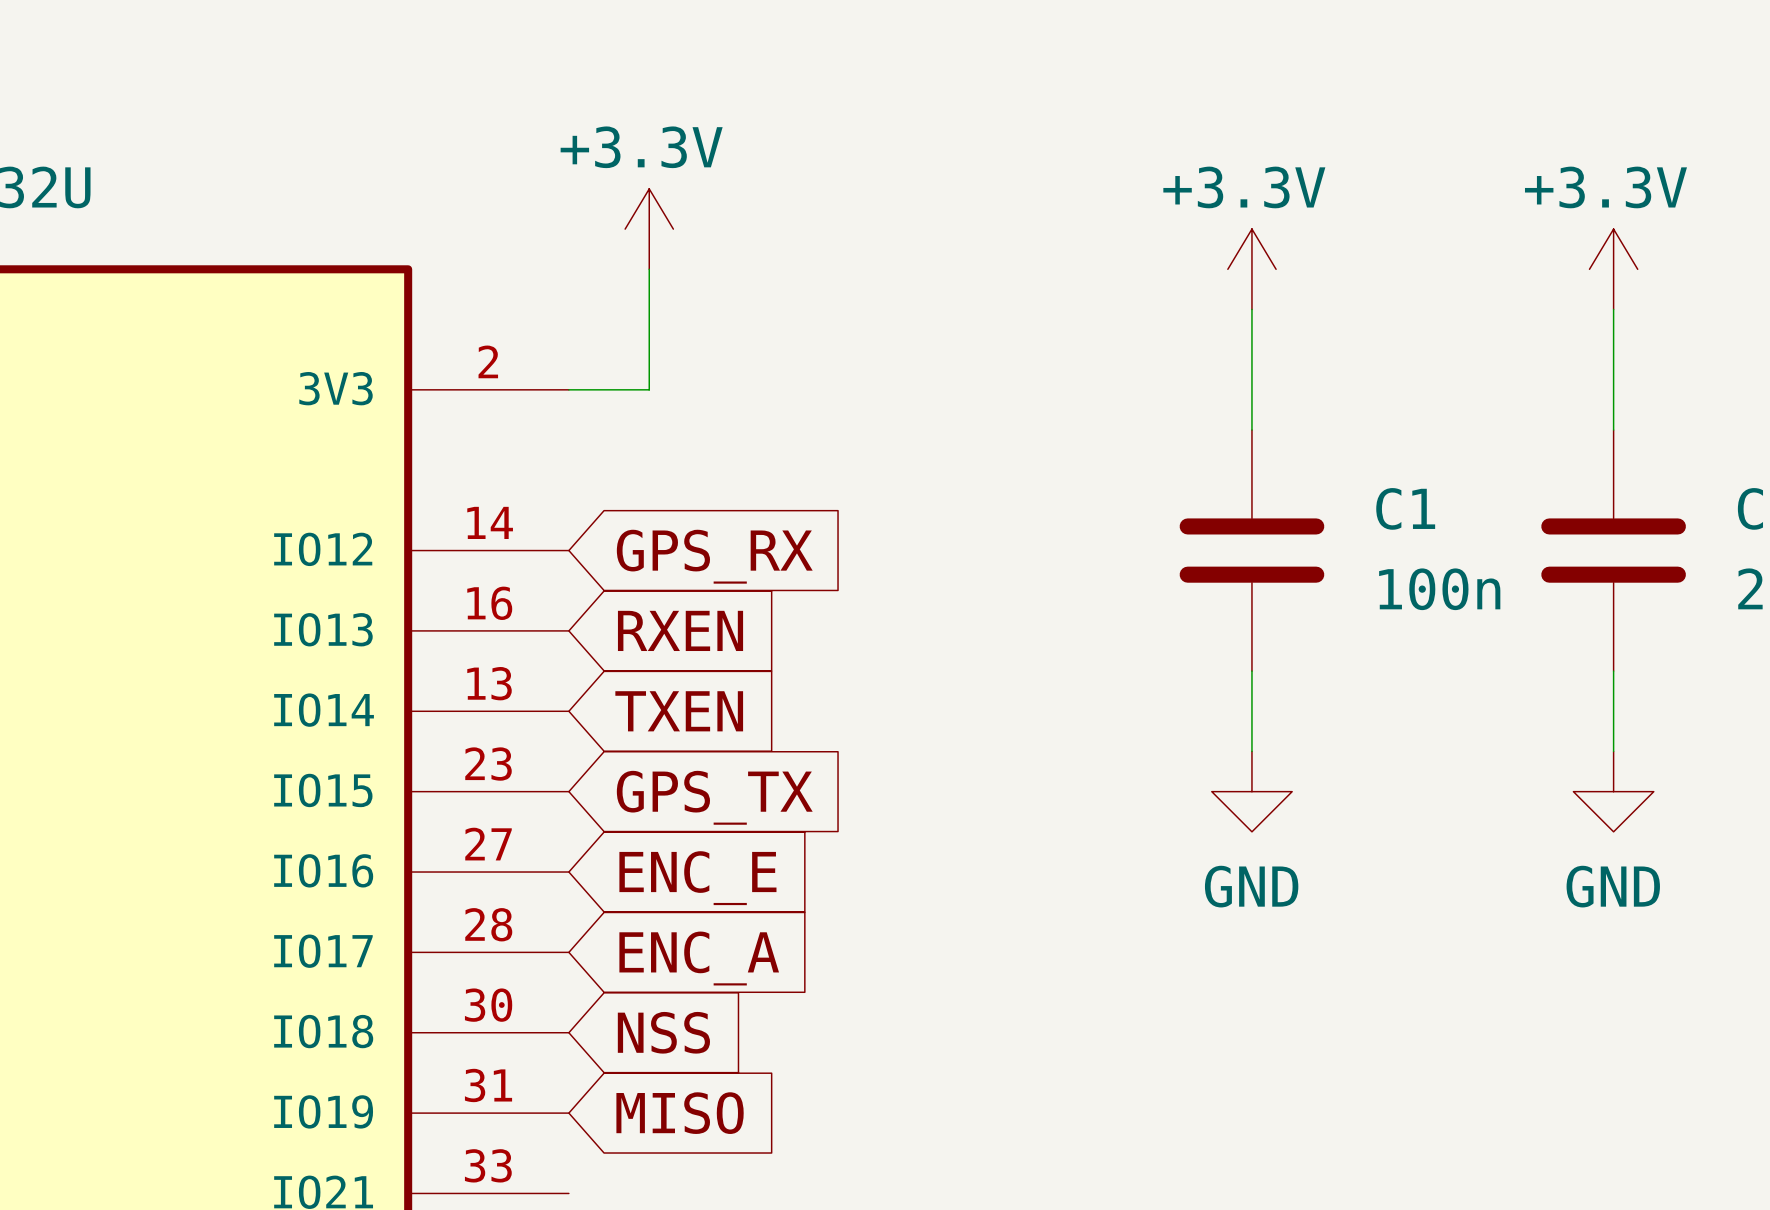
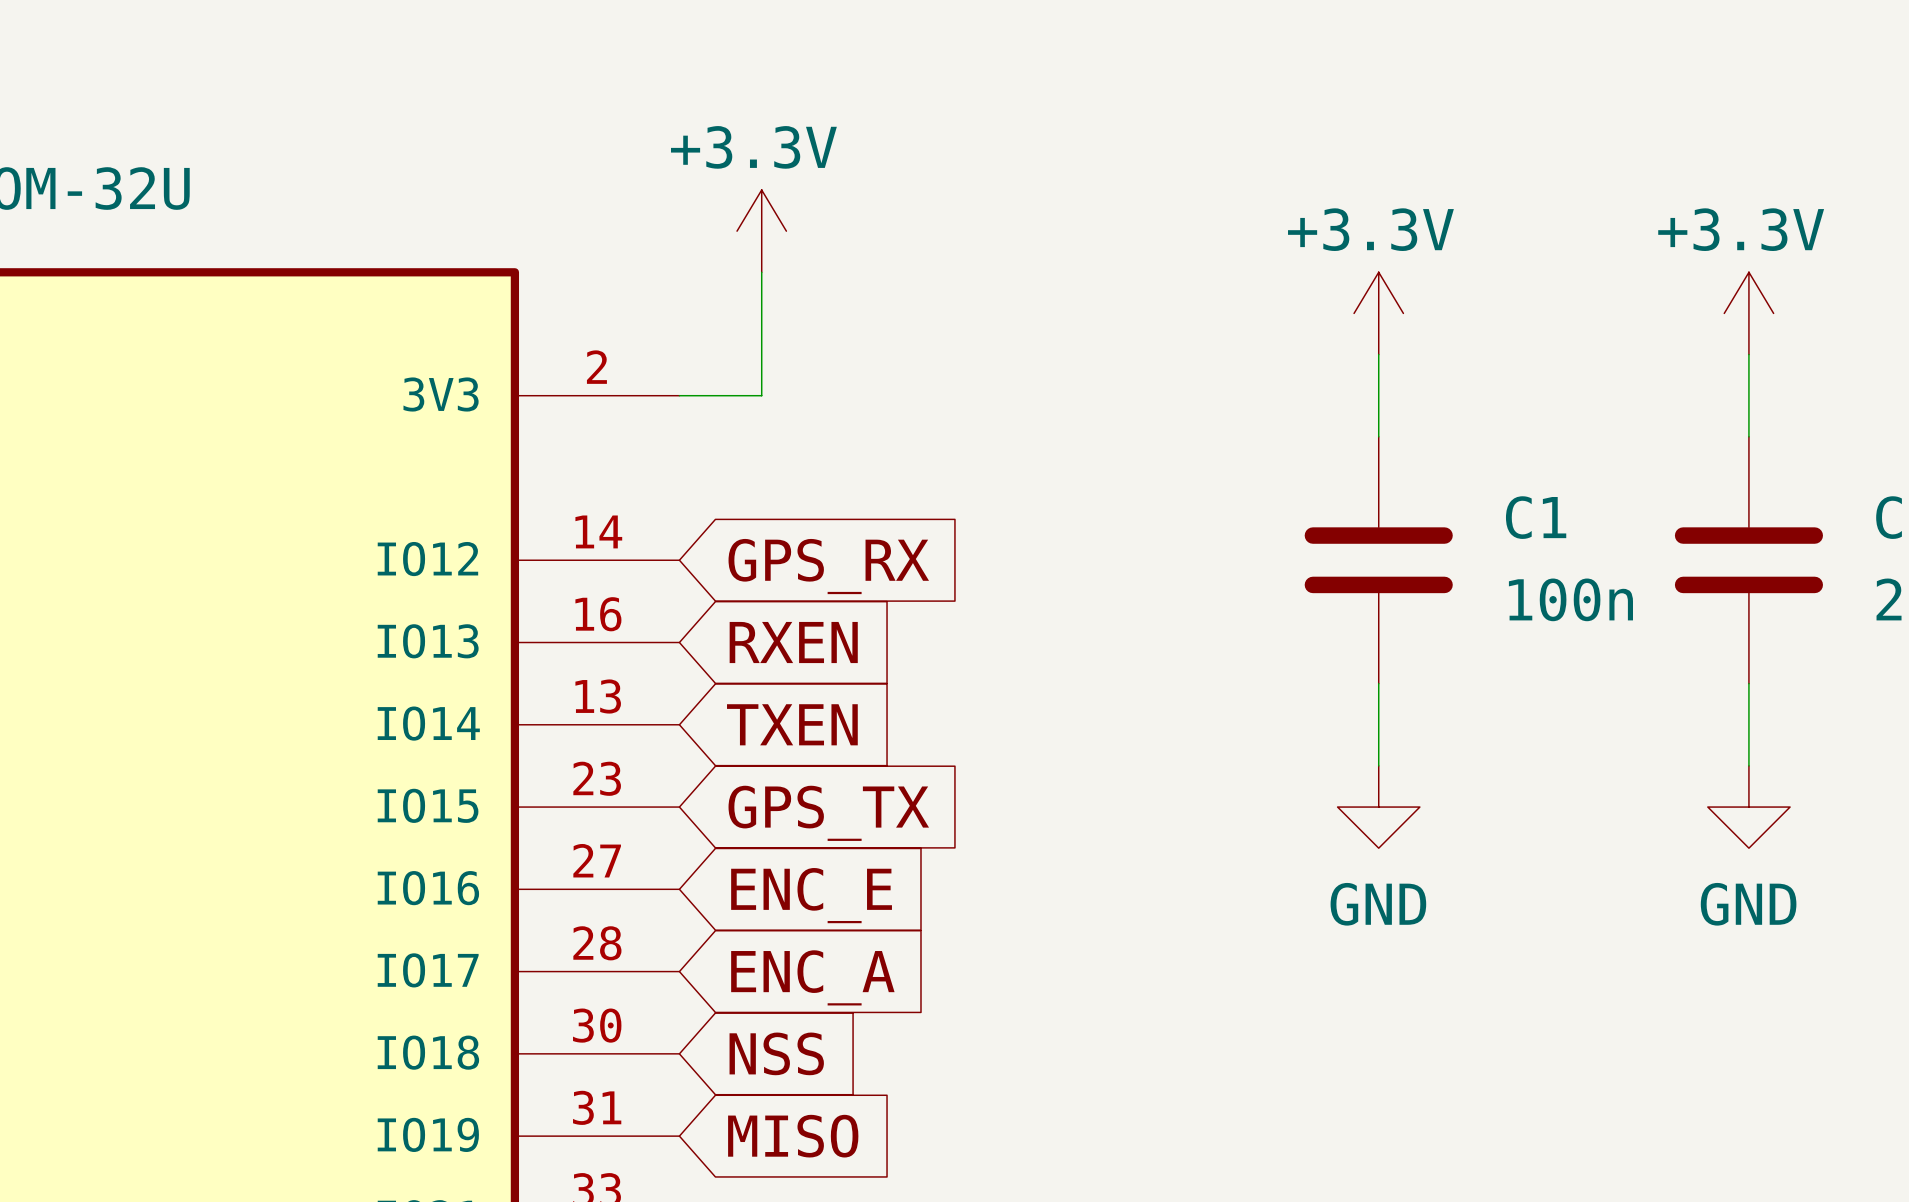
power symbol position: +3.3V (1251, 269) -> +3.3V (1378, 313)
power symbol position: +3.3V (1613, 269) -> +3.3V (1748, 313)

